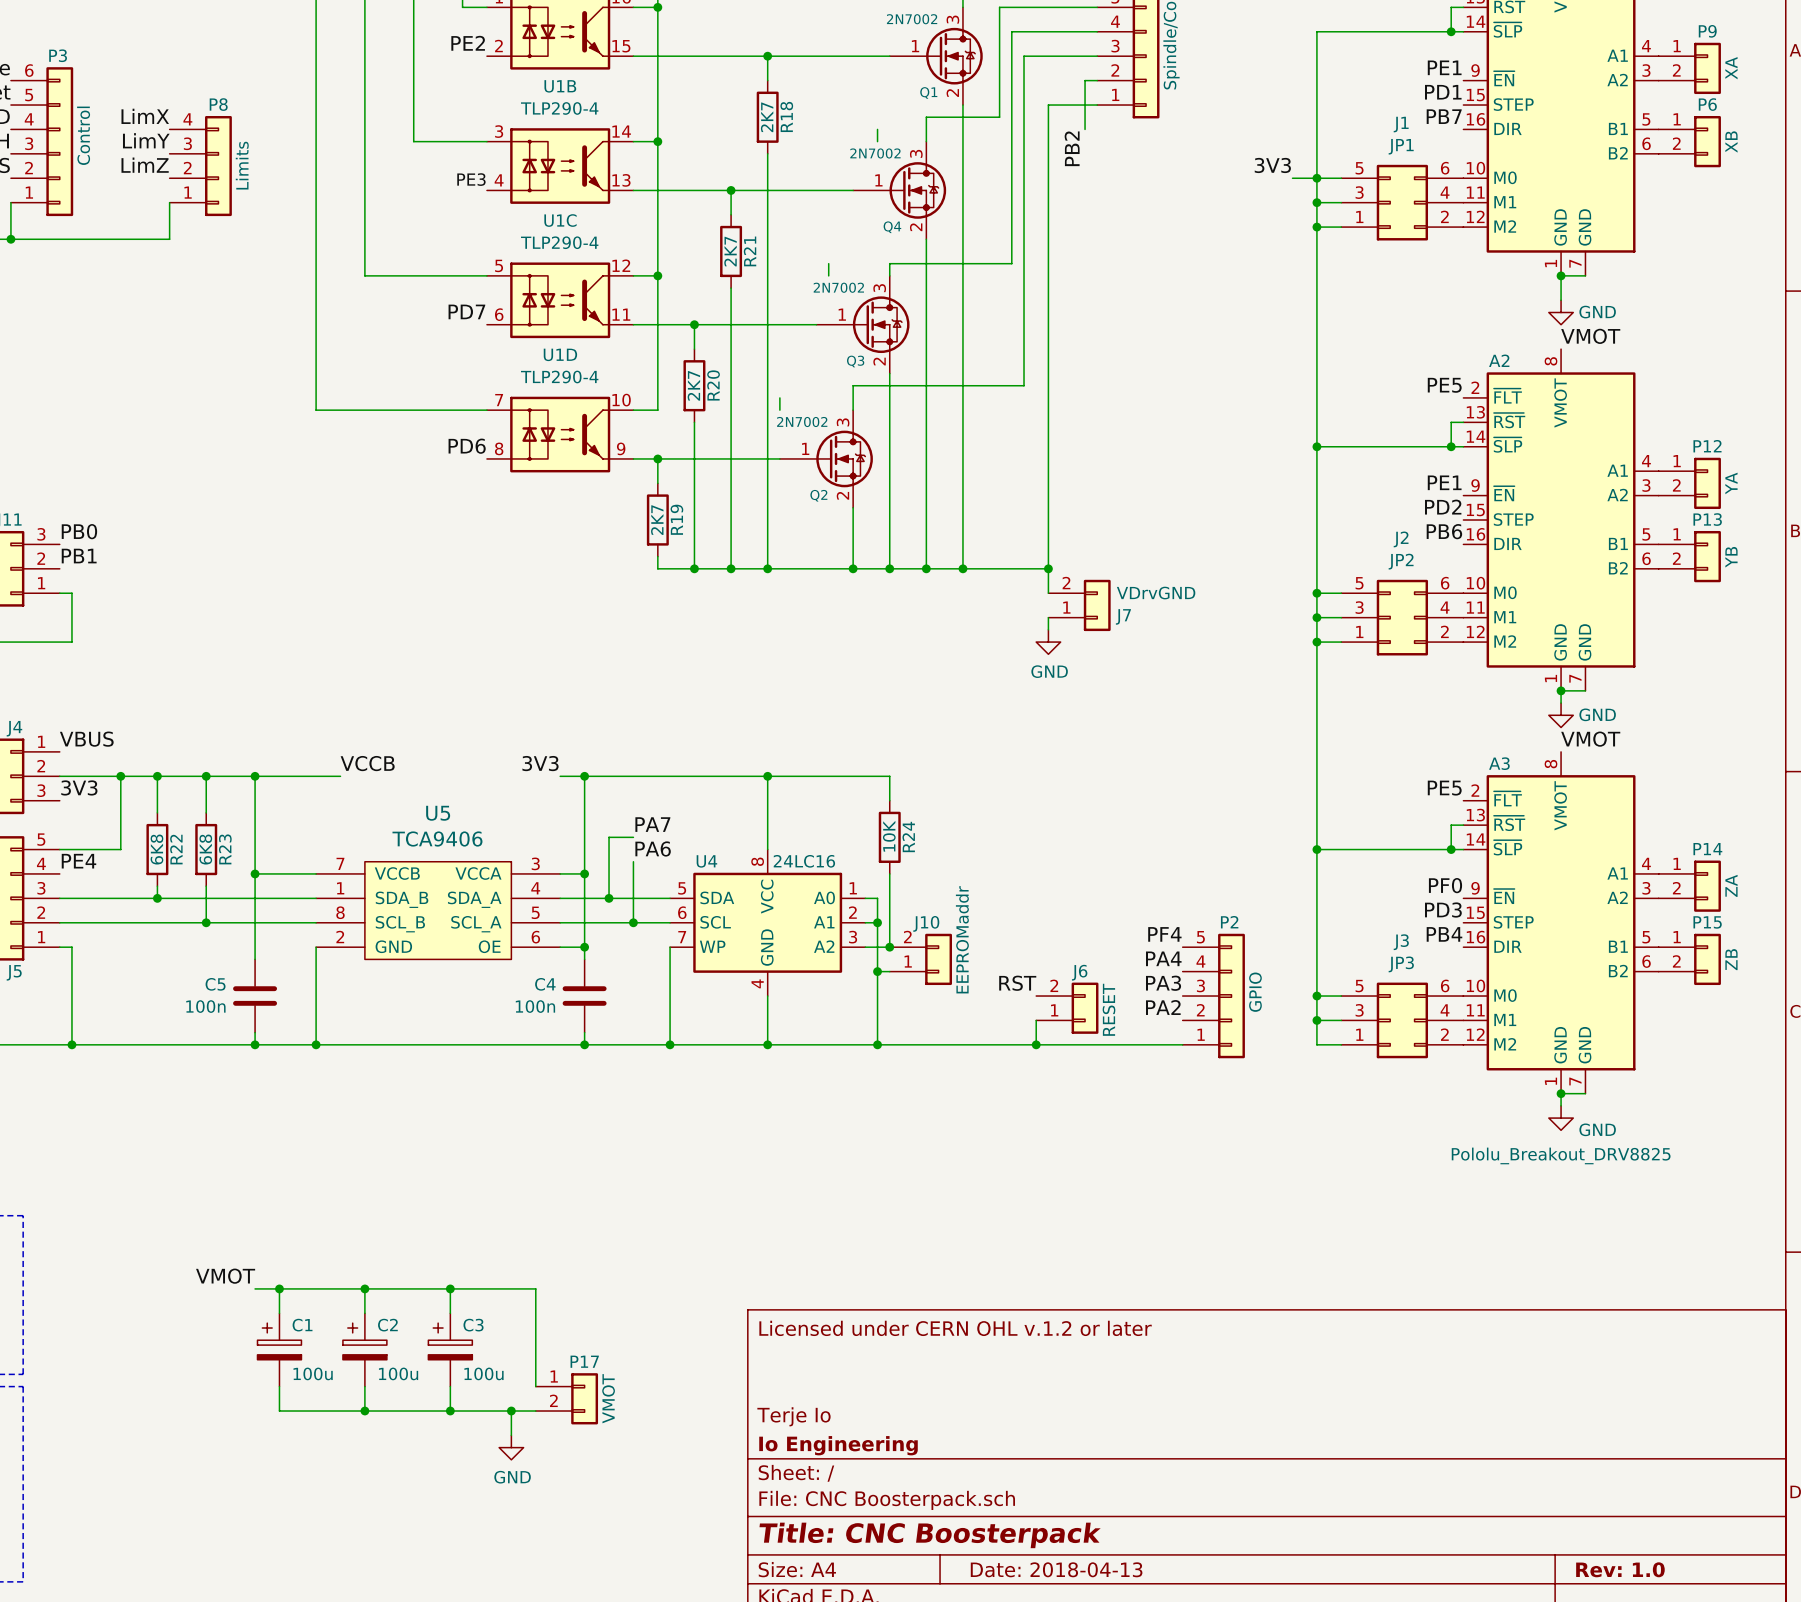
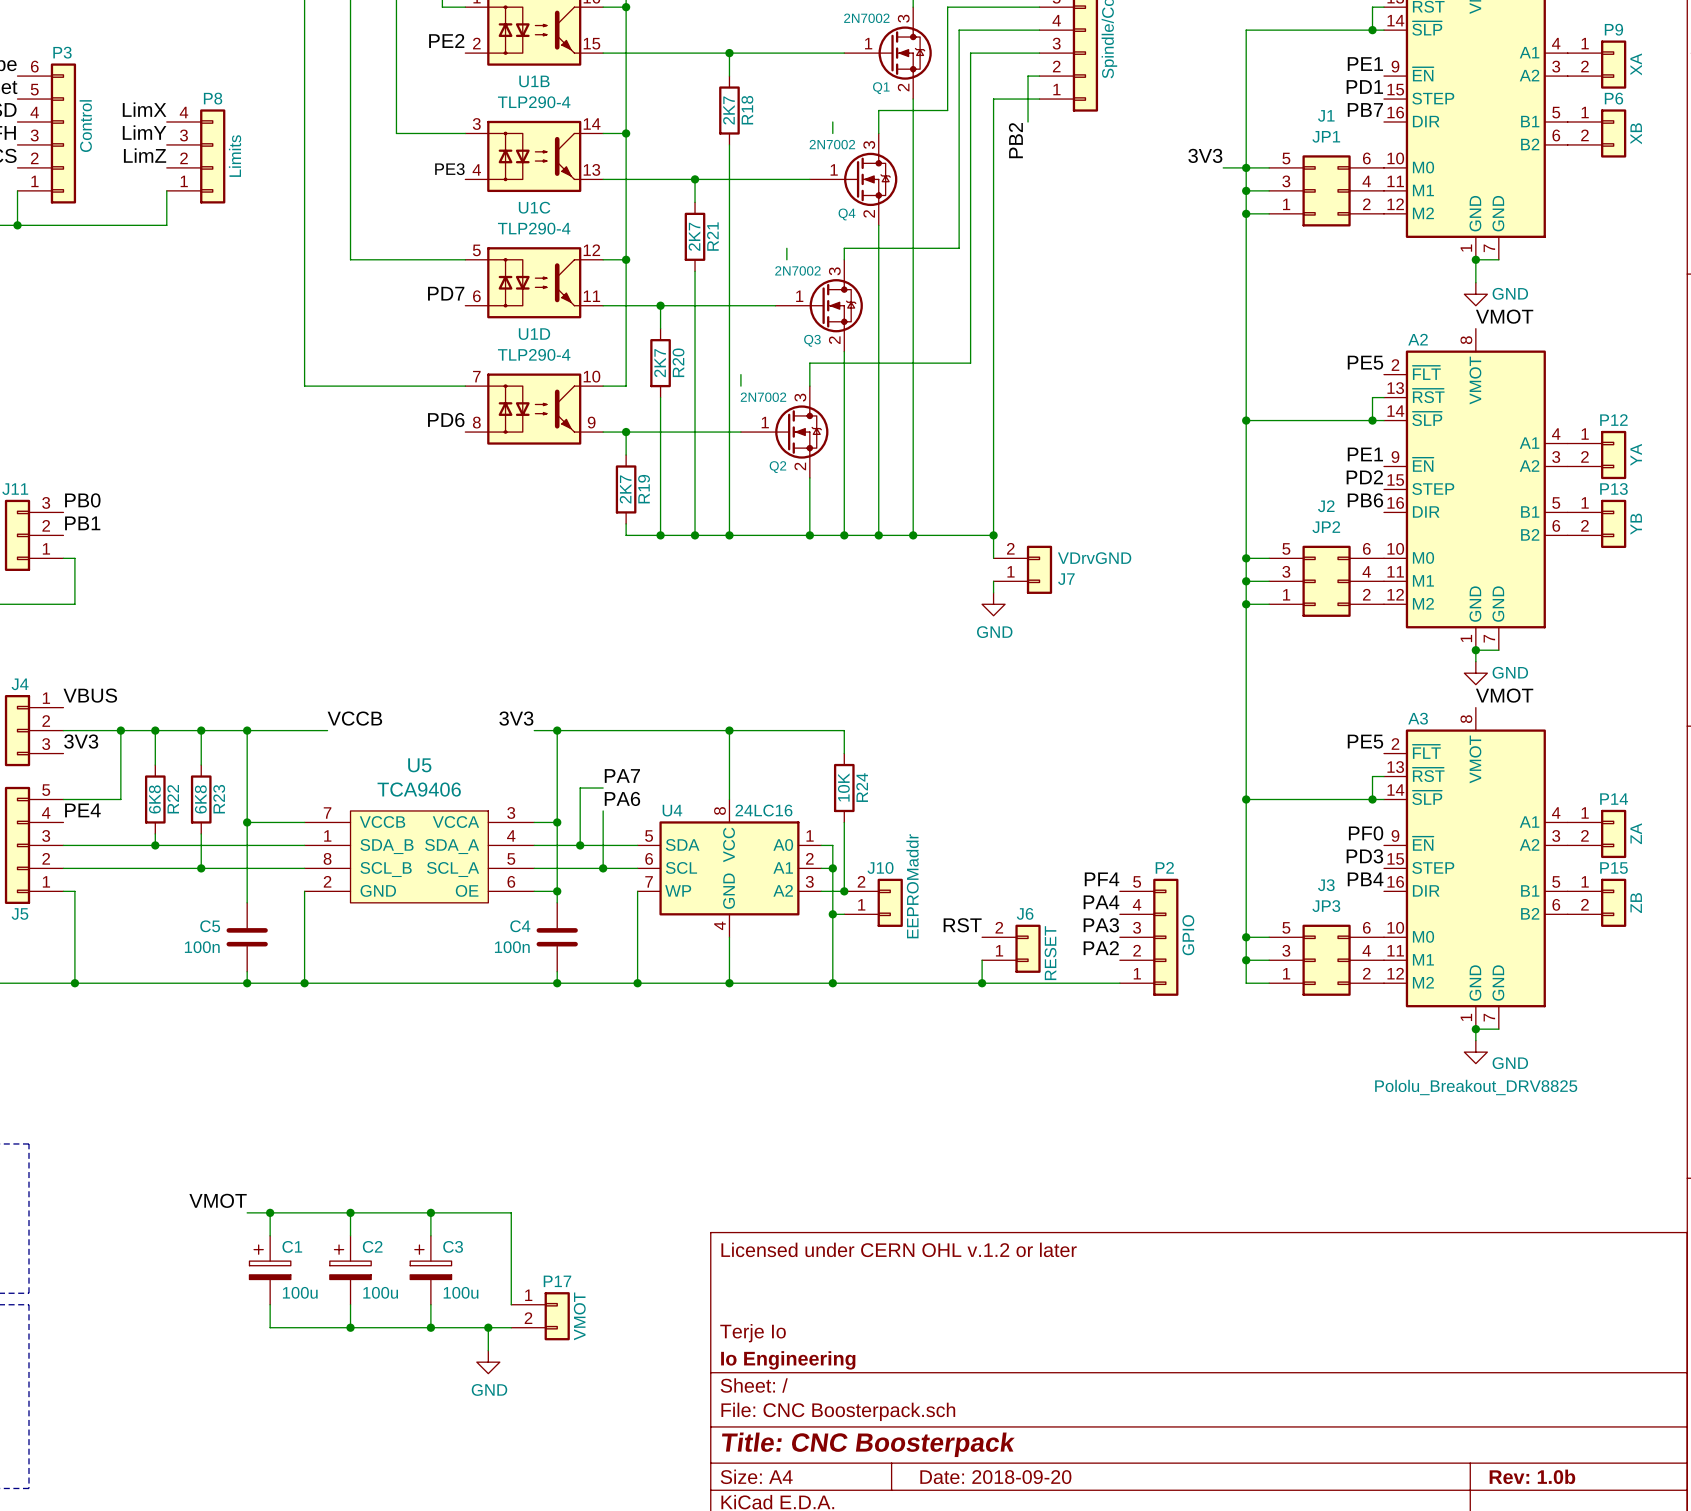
title block: Date: 2018-04-13 (1056, 1569) -> Date: 2018-09-20 (995, 1477)
title block: Rev: 1.0 (1620, 1569) -> Rev: 1.0b (1532, 1476)

